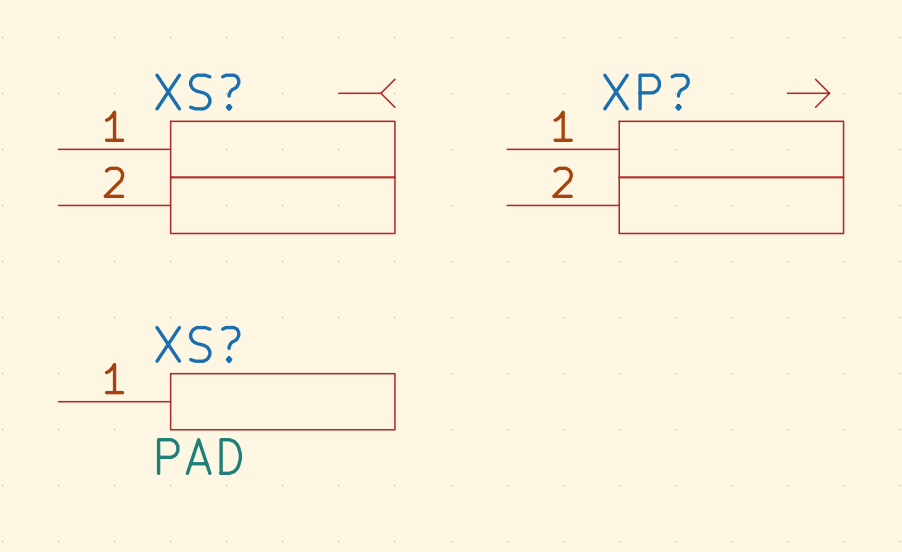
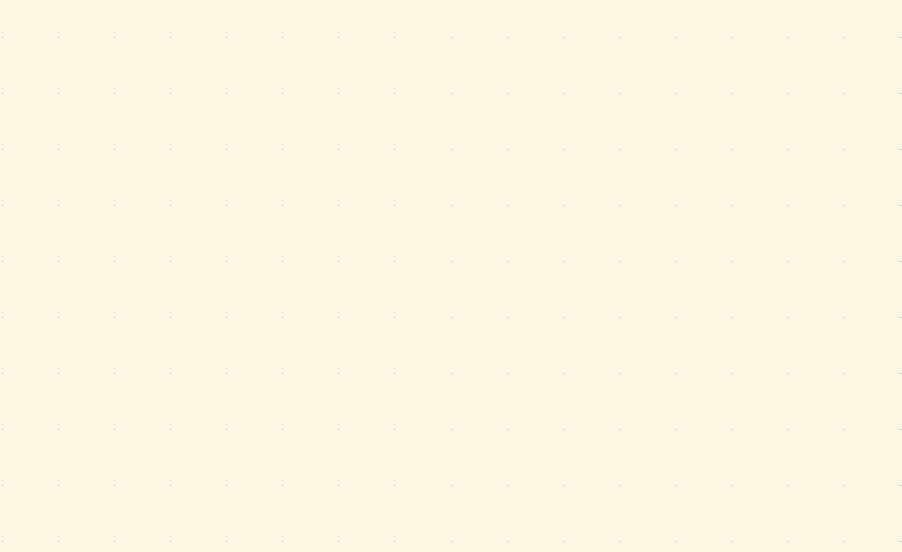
XS?: (226, 156) -> none
XP?: (675, 156) -> none
XS?: PAD (226, 401) -> none

